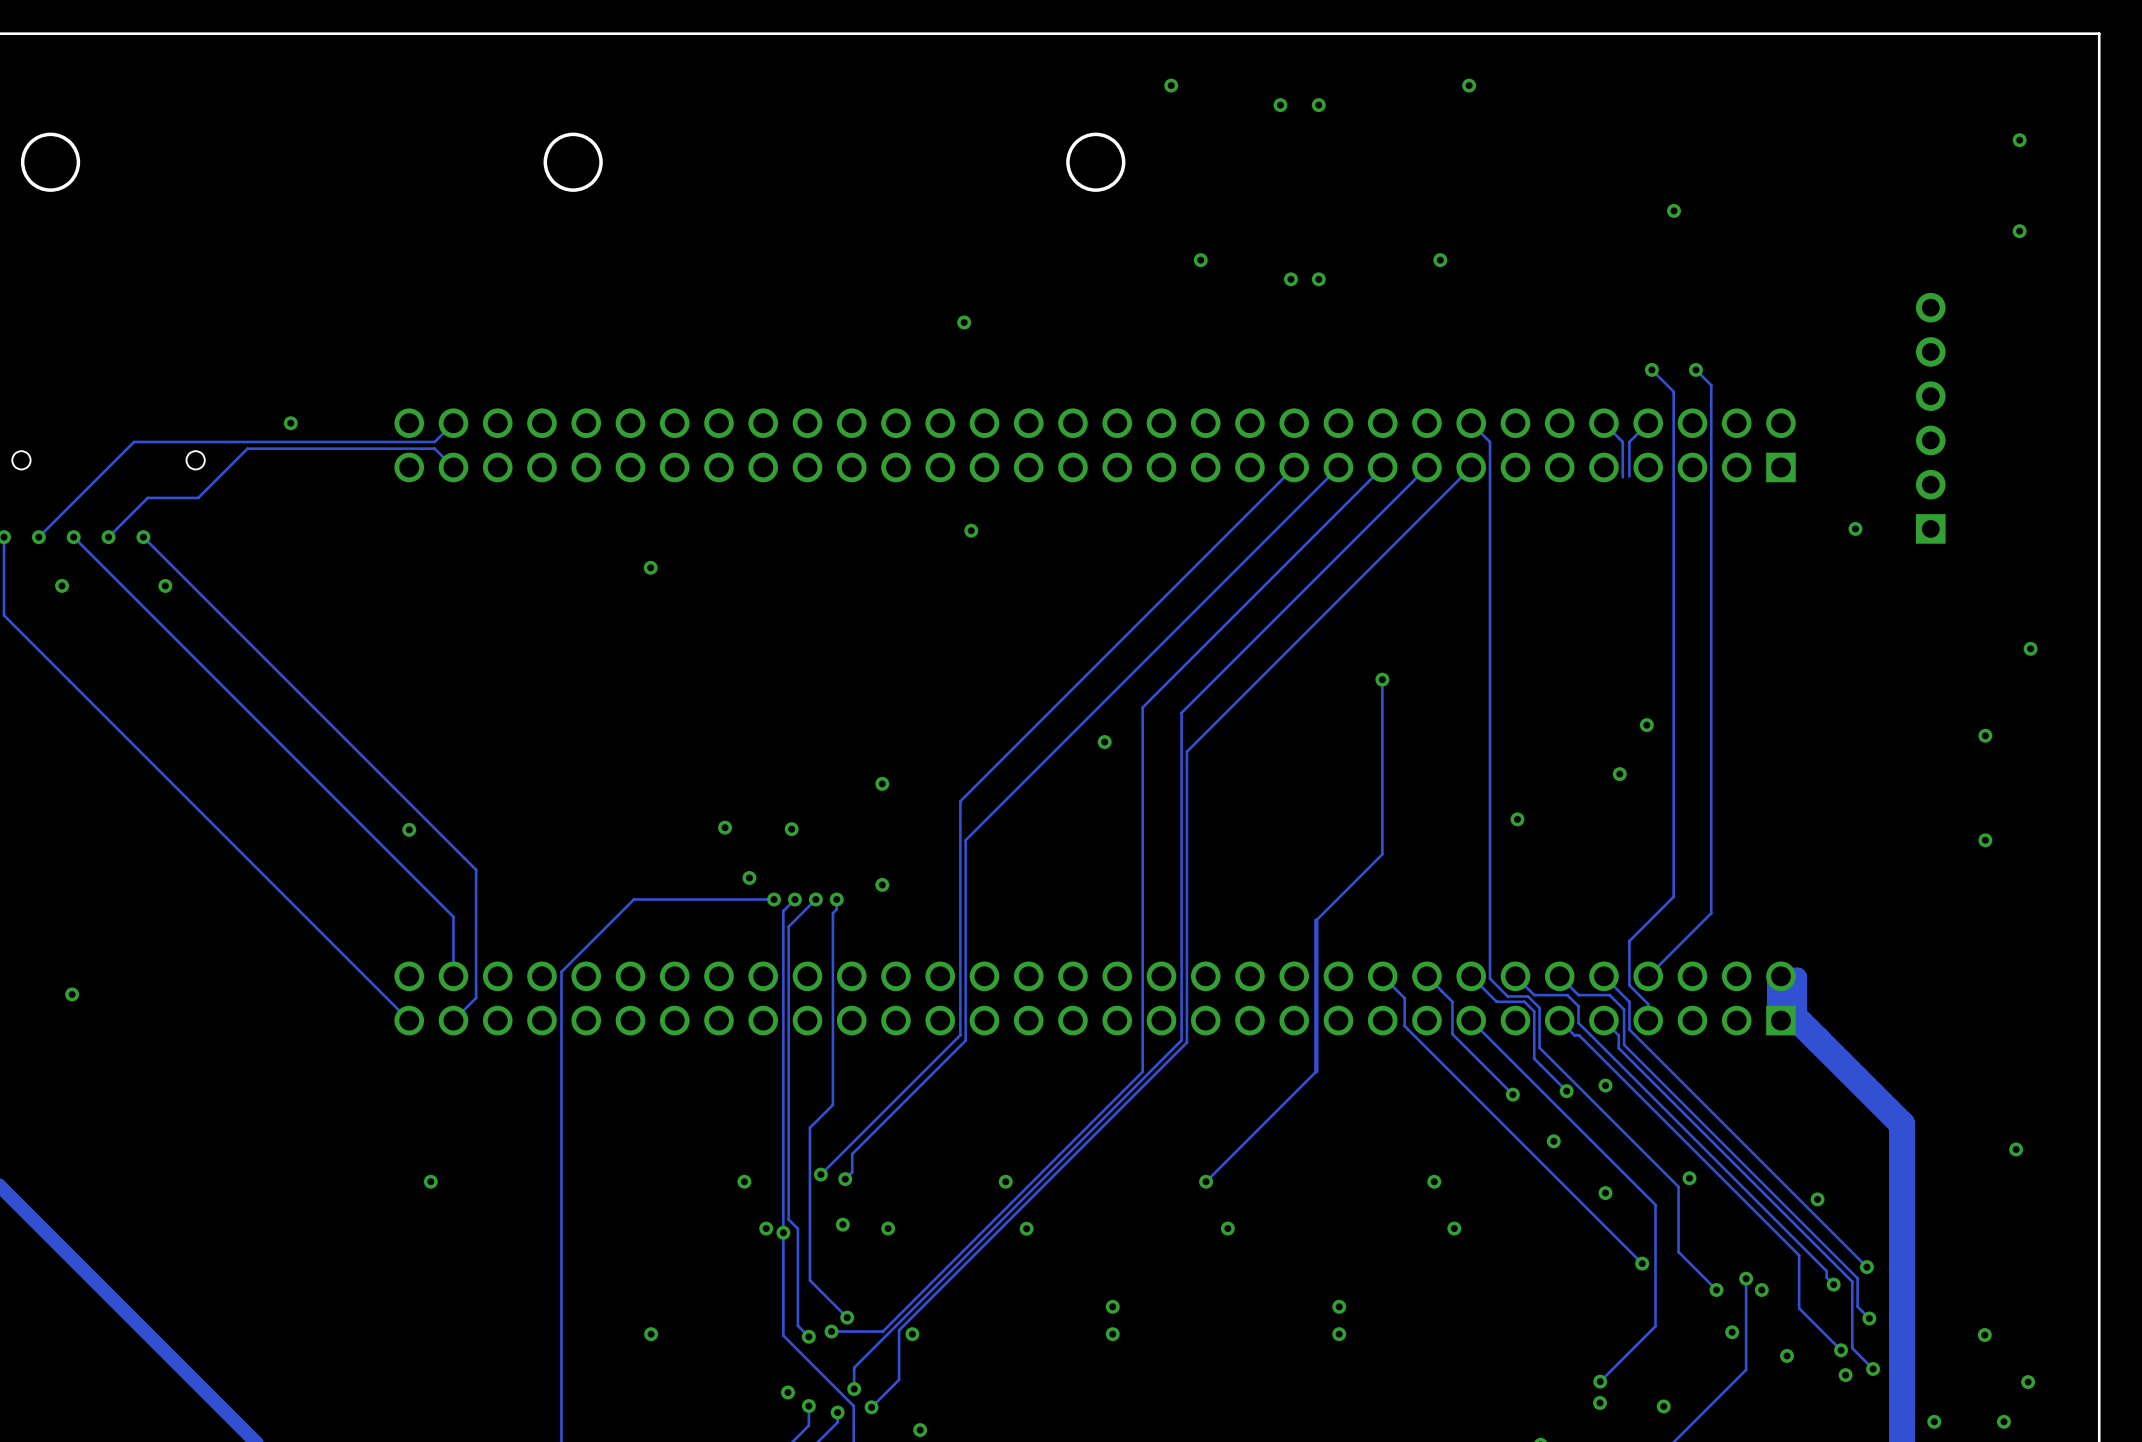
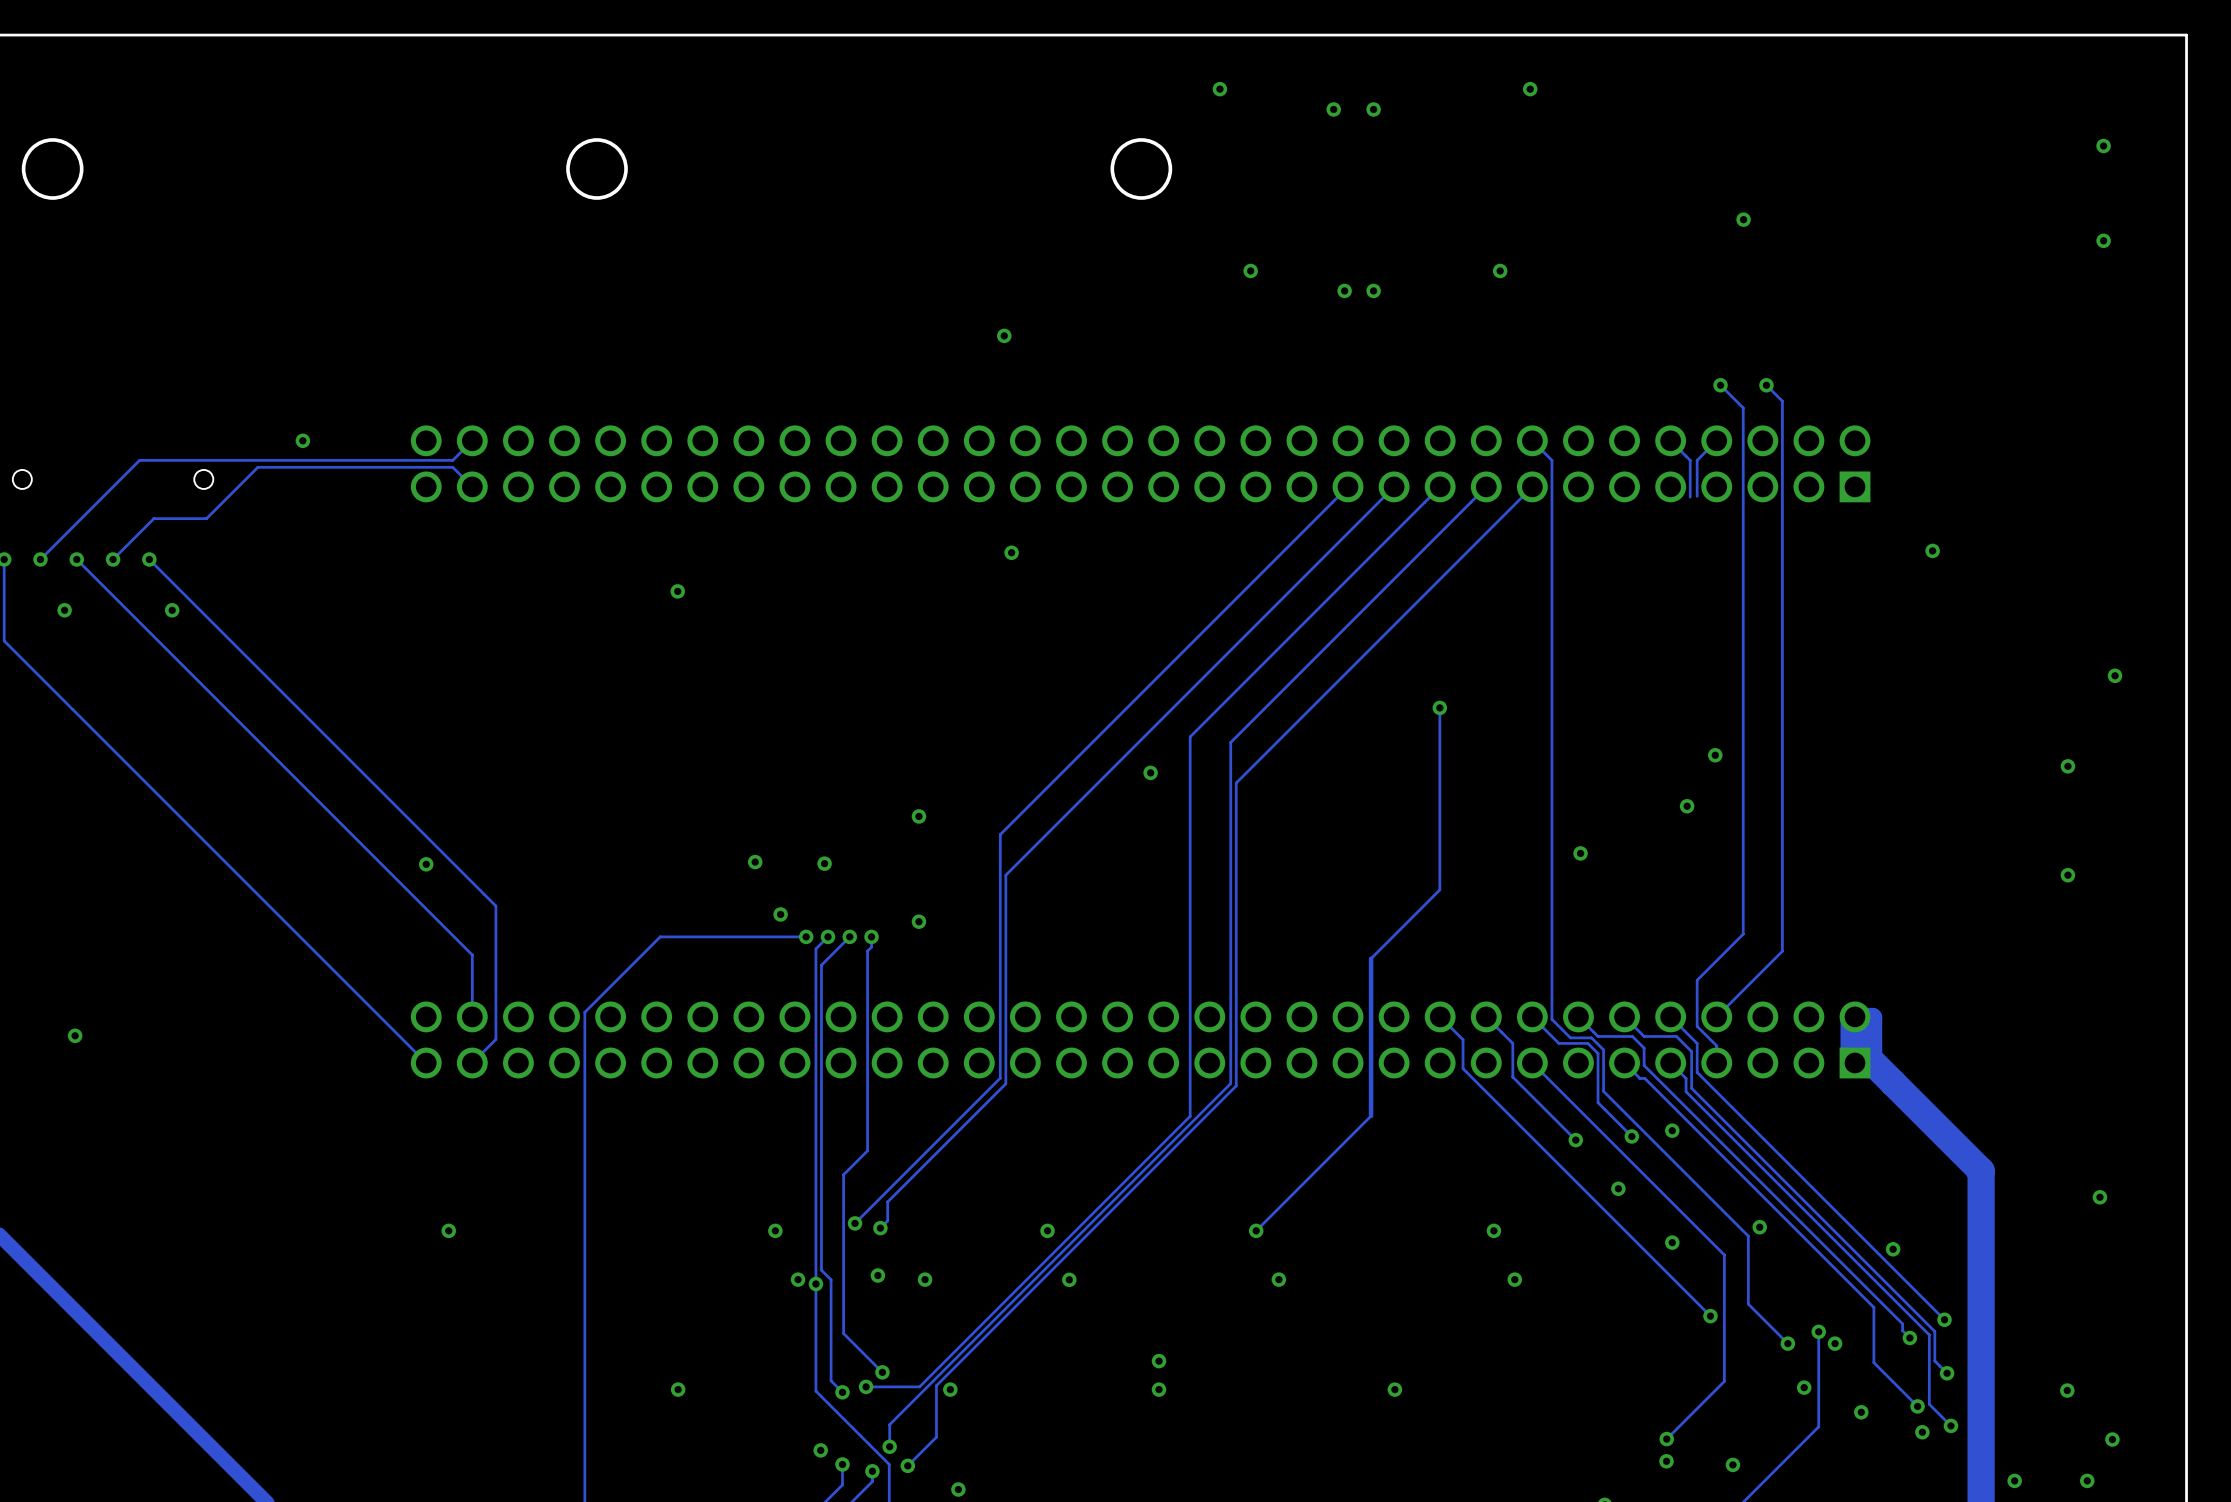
part: (1930, 418) -> none
via: (1339, 1306) -> none

